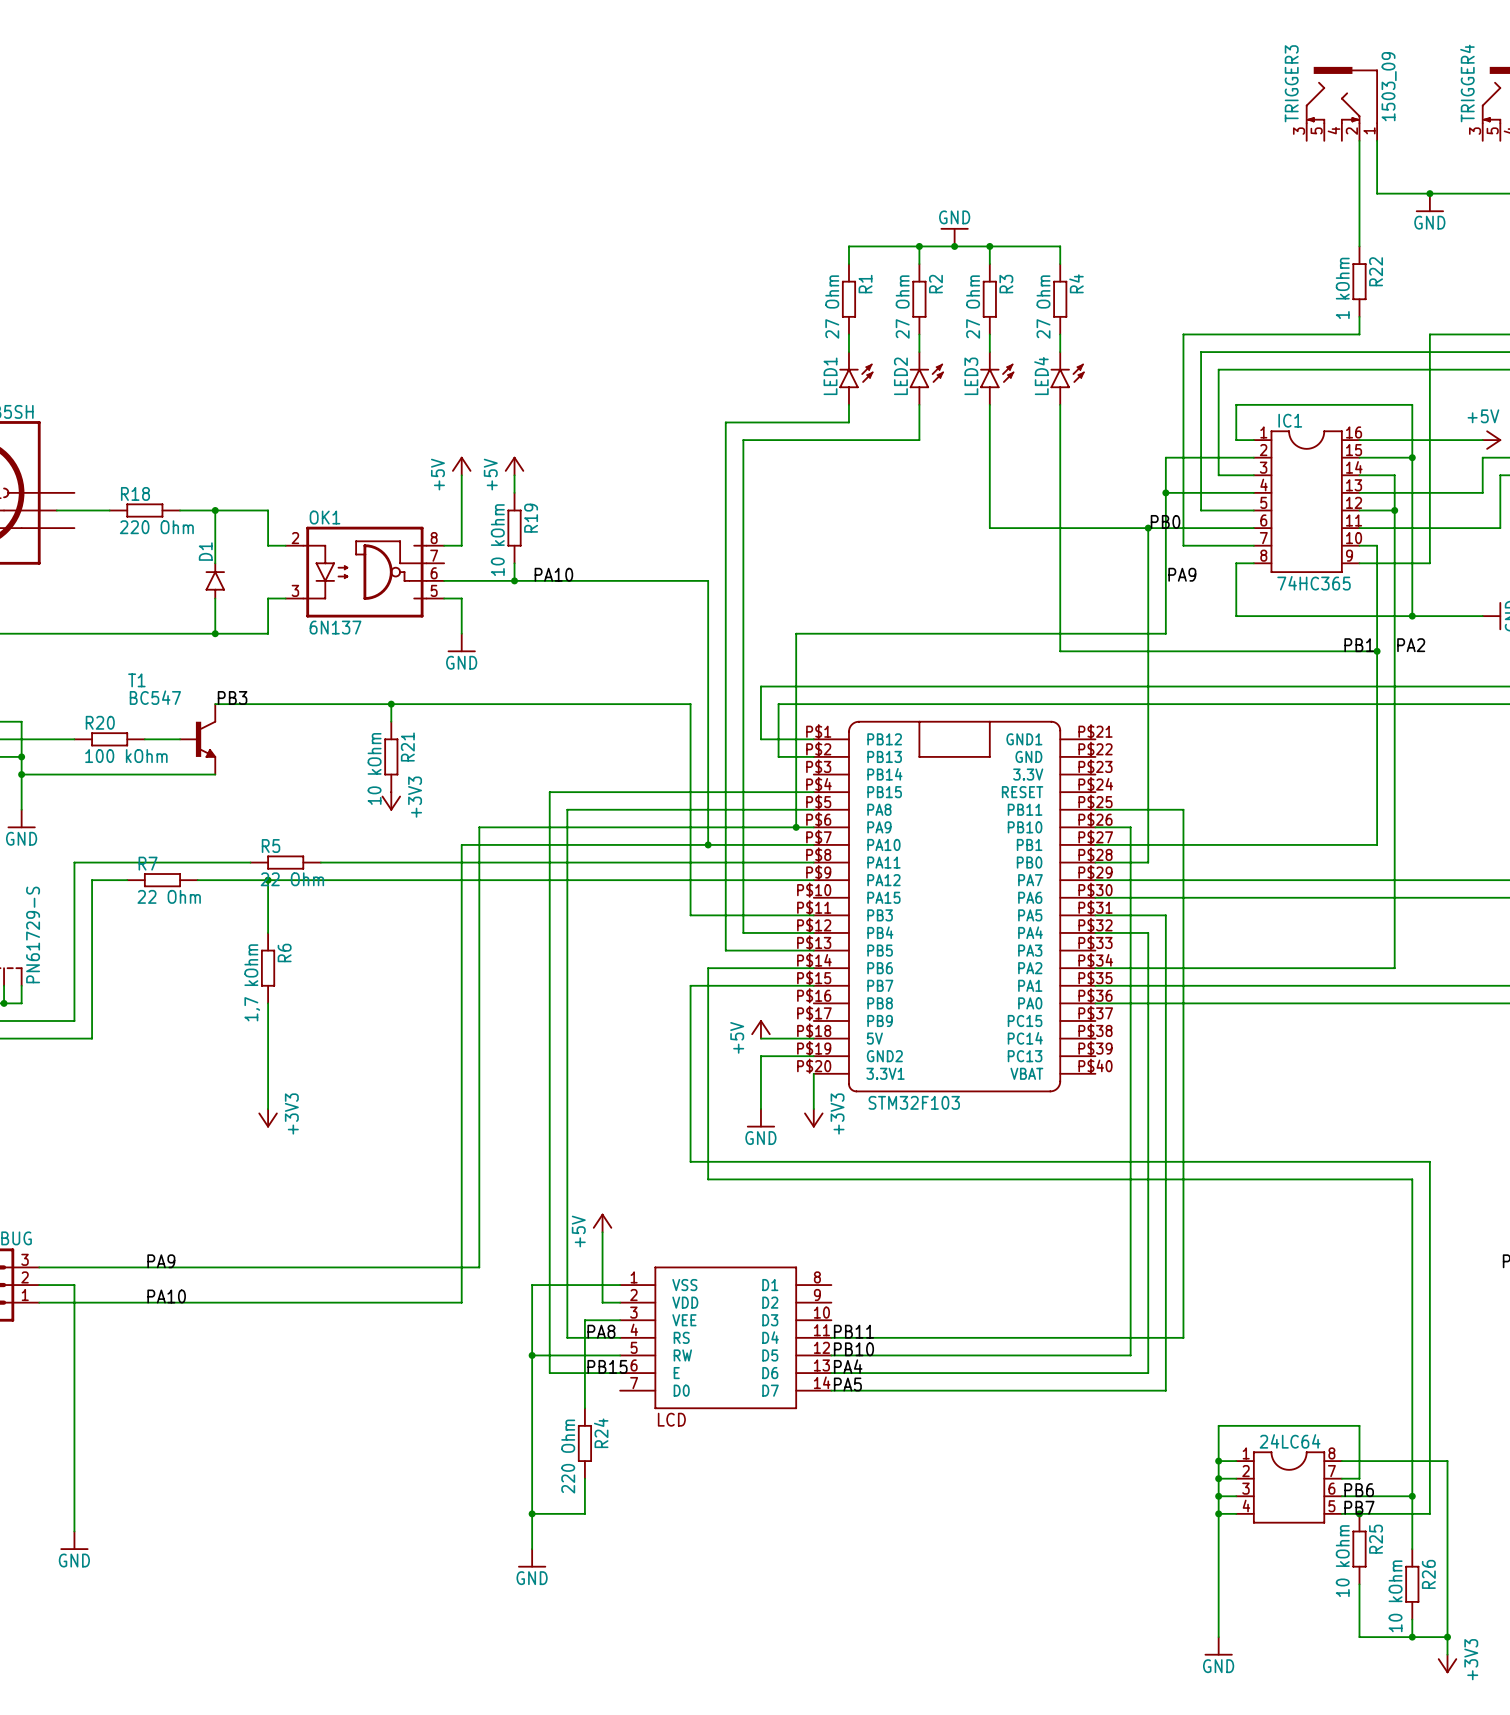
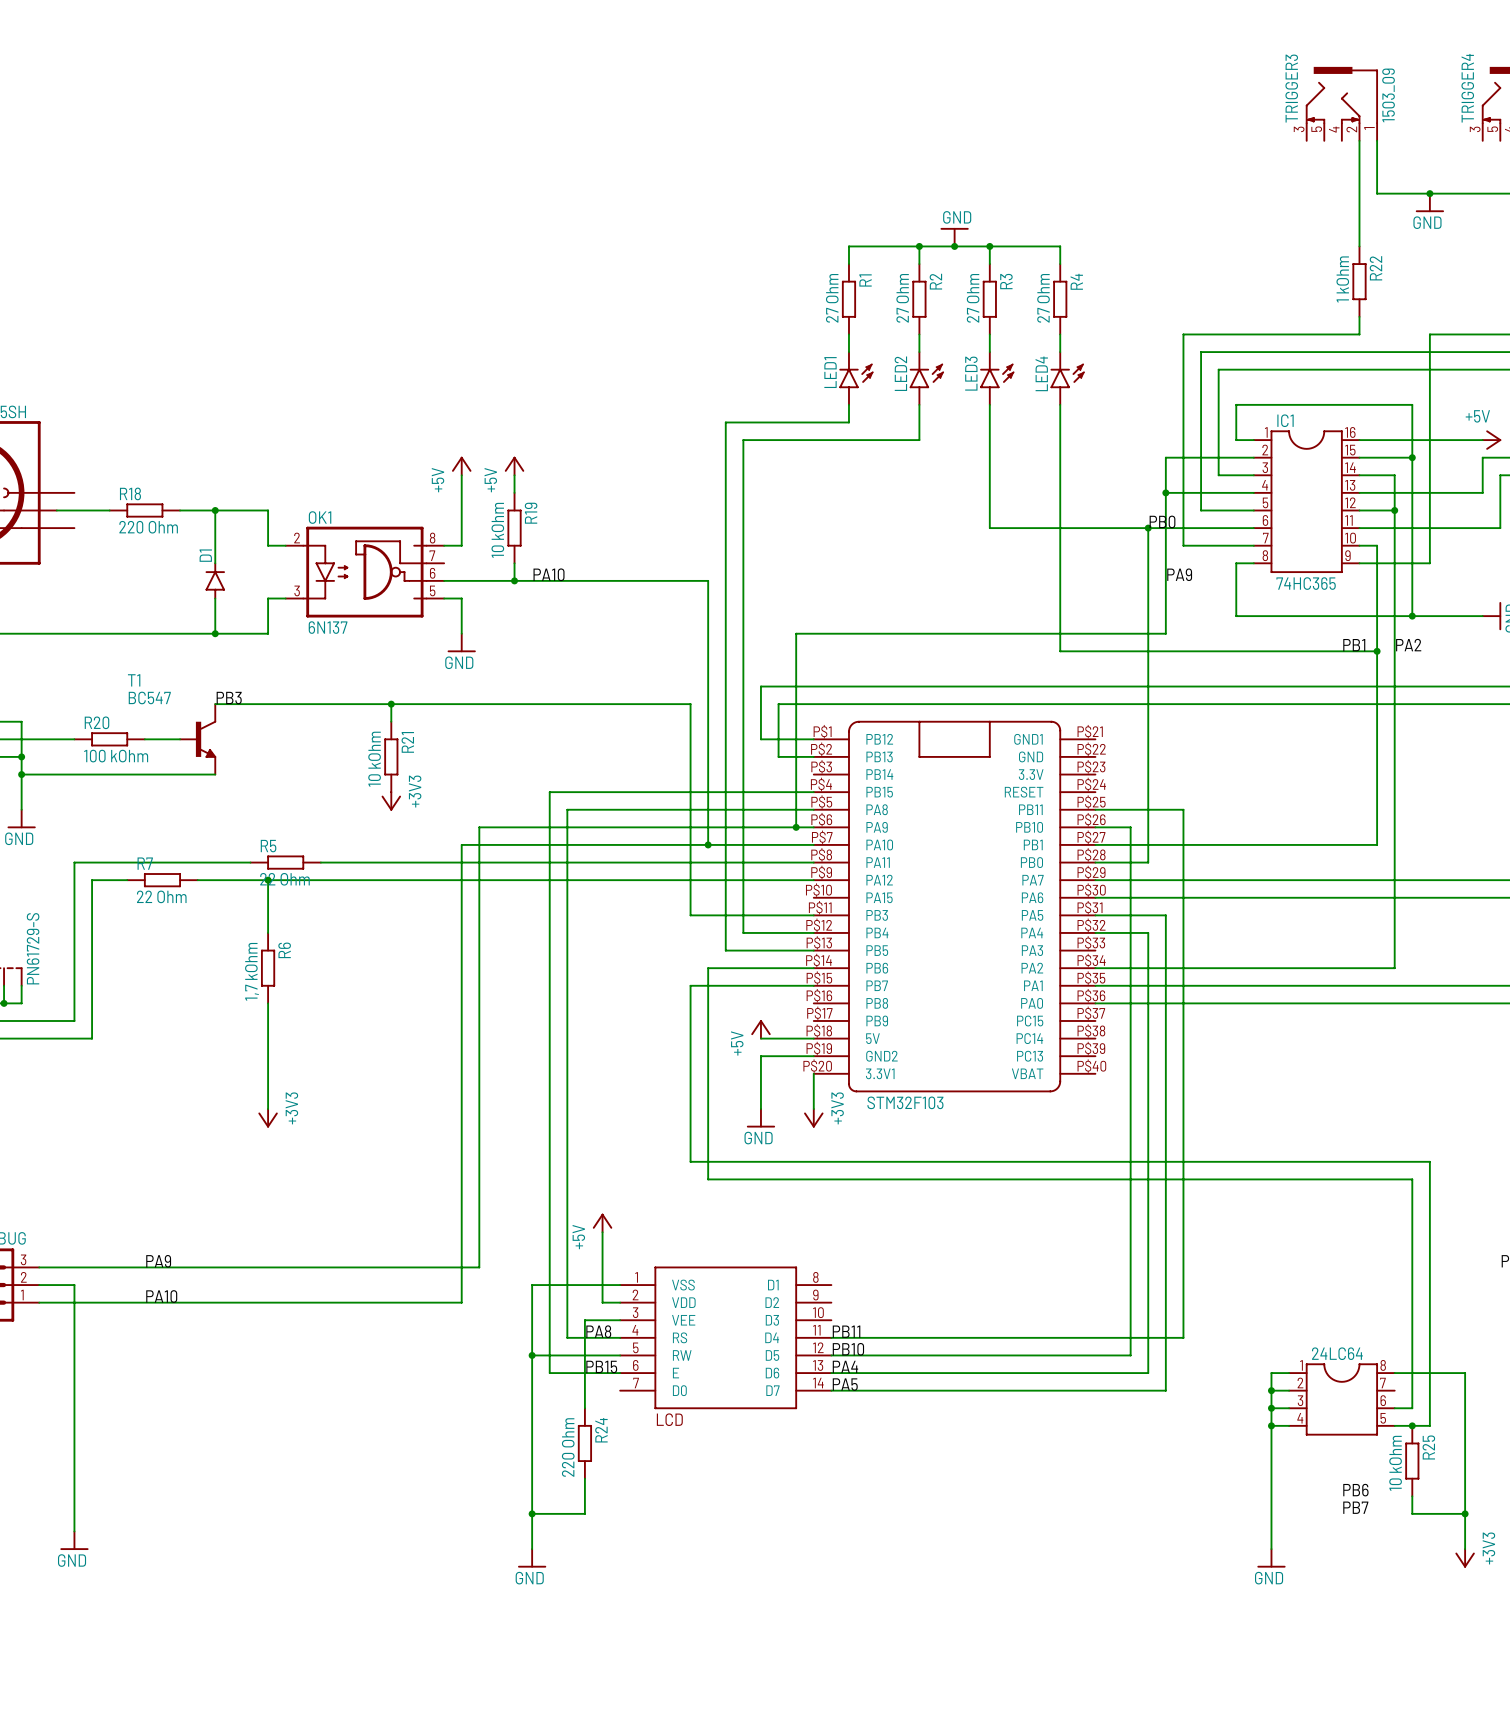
wire: none -> (1289, 1373) (1271, 1373) (1271, 1549)
wire: none -> (1394, 1373) (1465, 1373) (1465, 1549)
junction: none -> (1271, 1390)
junction: none -> (1271, 1408)
wire: (1412, 1408) (1412, 1496) (1341, 1496) -> (1412, 1408) (1394, 1408)
wire: (1271, 1425) (1218, 1425) (1218, 1637) -> none
junction: none -> (1271, 1425)
wire: (1289, 1425) (1359, 1425) (1359, 1478) (1341, 1478) -> none
wire: none -> (1394, 1425) (1429, 1425)
junction: none -> (1412, 1425)
wire: (1429, 1425) (1429, 1513) -> (1465, 1513) (1429, 1513)
wire: (1218, 1461) (1236, 1461) -> (1271, 1390) (1289, 1390)
junction: (1218, 1461) -> none
wire: (1341, 1461) (1447, 1461) (1447, 1654) -> none
wire: (1218, 1478) (1236, 1478) -> (1271, 1408) (1289, 1408)
junction: (1218, 1478) -> none
24LC64 position: (1289, 1487) -> (1341, 1399)
wire: (1218, 1496) (1236, 1496) -> none
junction: (1218, 1496) -> none
junction: (1412, 1496) -> none
wire: (1218, 1513) (1236, 1513) -> none
junction: (1218, 1513) -> none
wire: (1341, 1513) (1412, 1513) (1412, 1549) -> none
junction: (1359, 1513) -> none
junction: none -> (1465, 1513)
R25 position: (1359, 1549) -> (1412, 1461)
power symbol: none -> +3V3 (1465, 1558)
wire: (1359, 1584) (1359, 1637) (1447, 1637) -> none
R26: 10 kOhm (1412, 1584) -> none
wire: (1412, 1619) (1412, 1637) -> none
junction: (1412, 1637) -> none
junction: (1447, 1637) -> none
power symbol position: GND (1218, 1646) -> GND (1271, 1558)
power symbol: +3V3 (1447, 1663) -> none

